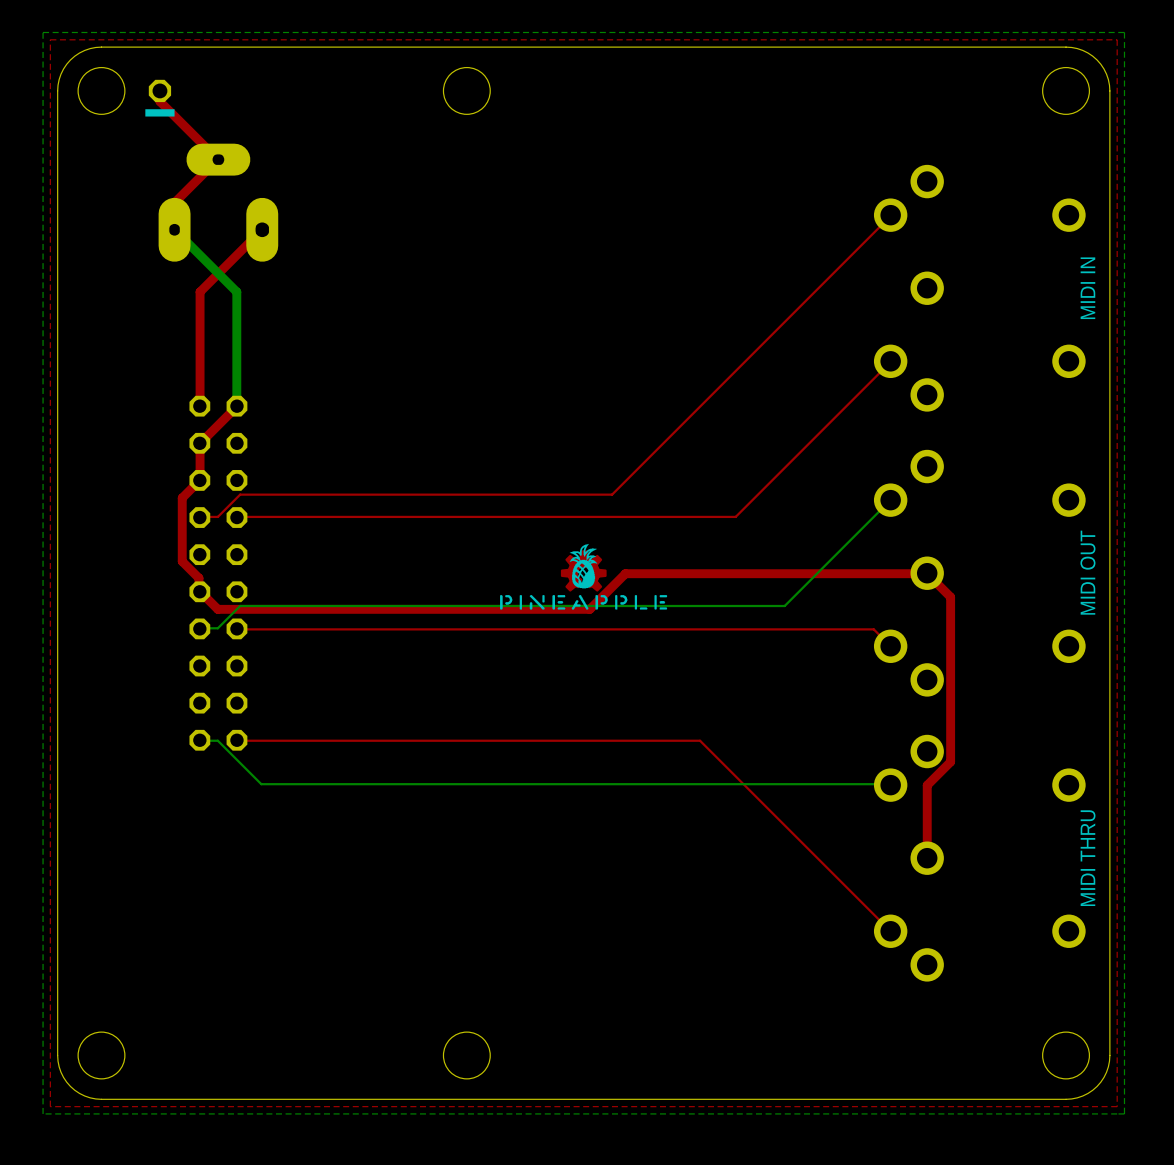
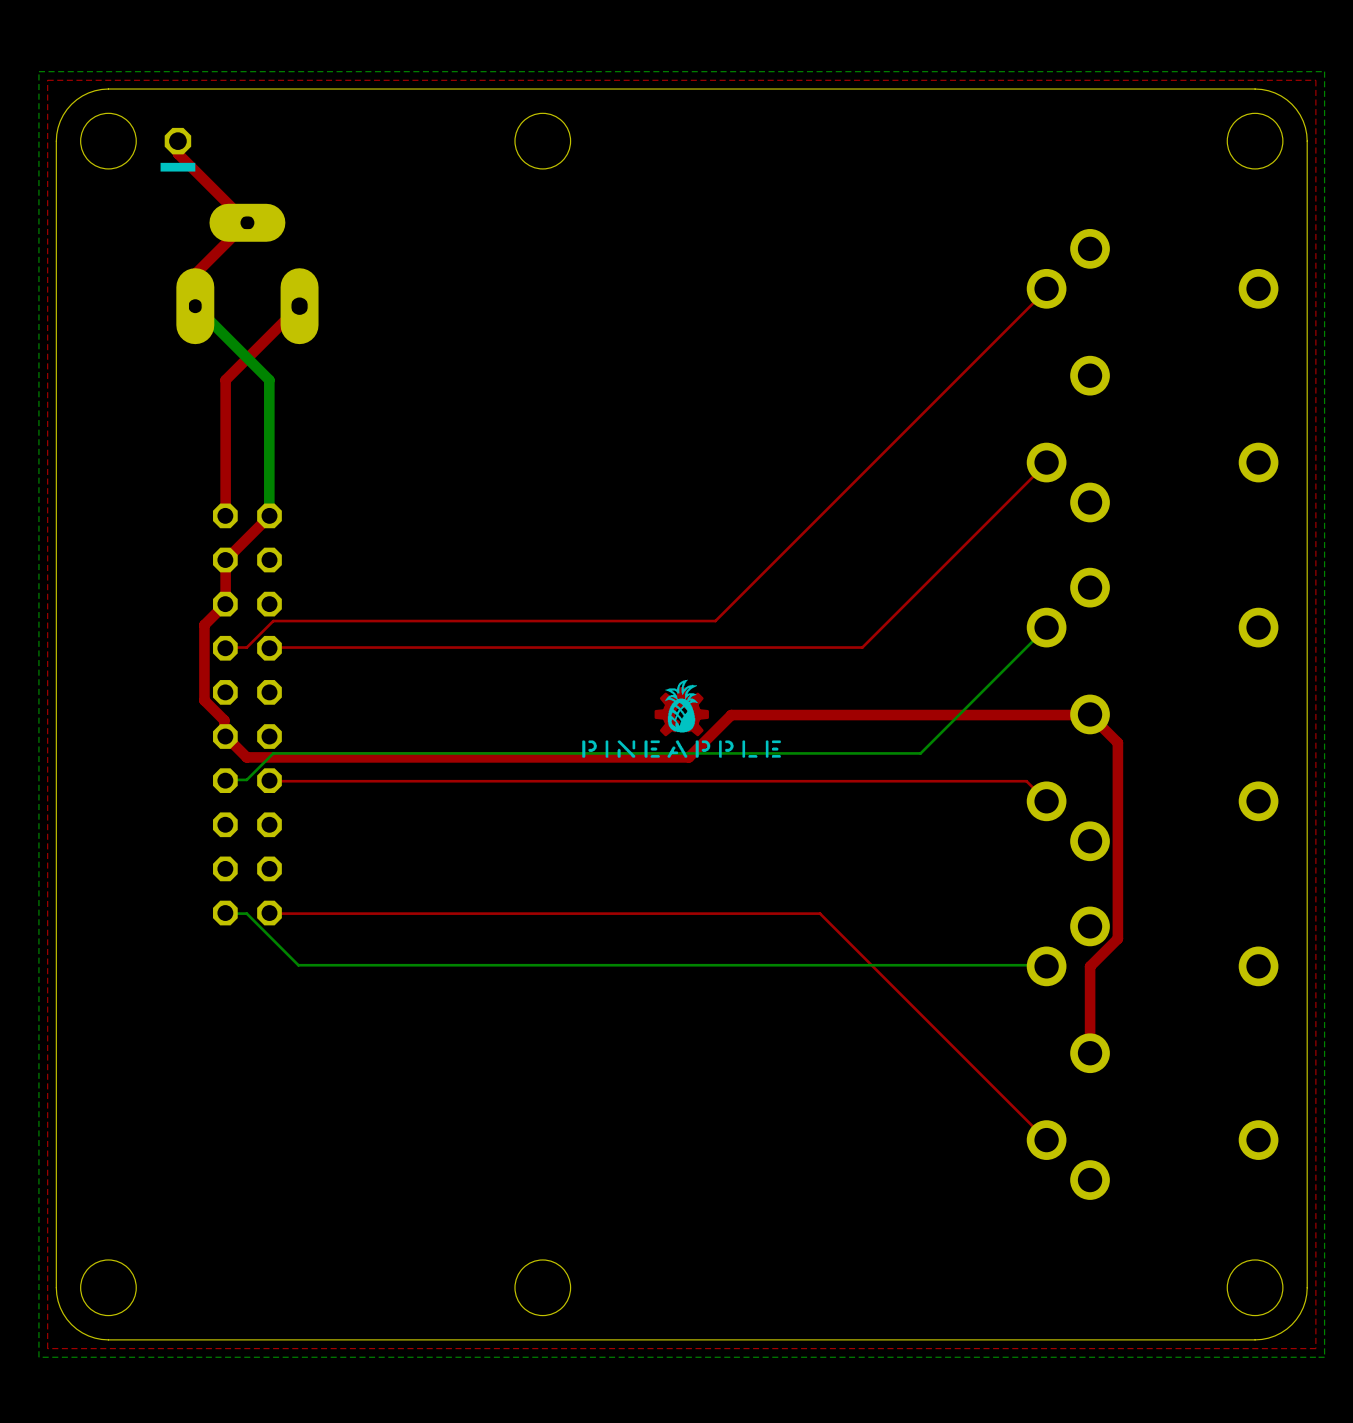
text: MIDI IN (1087, 288) -> none
text: MIDI OUT (1087, 572) -> none
text: MIDI THRU (1088, 858) -> none

